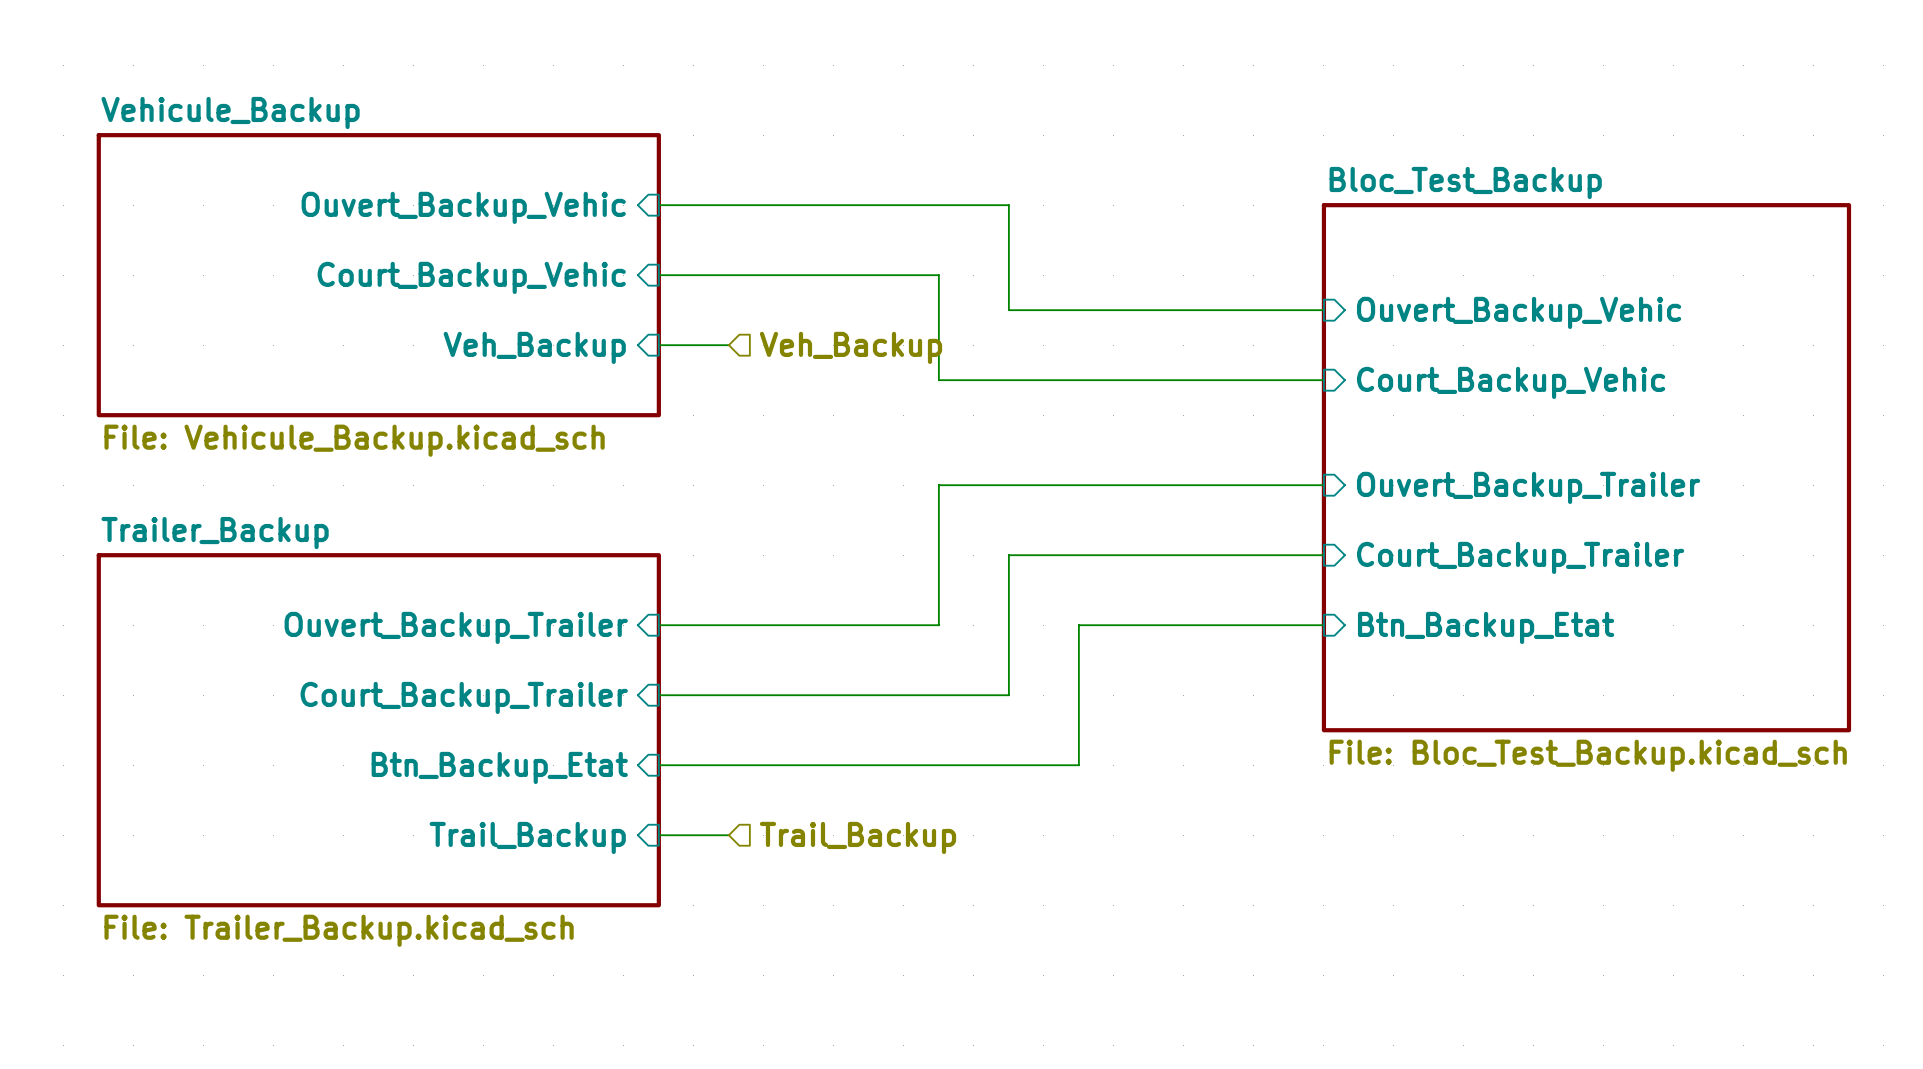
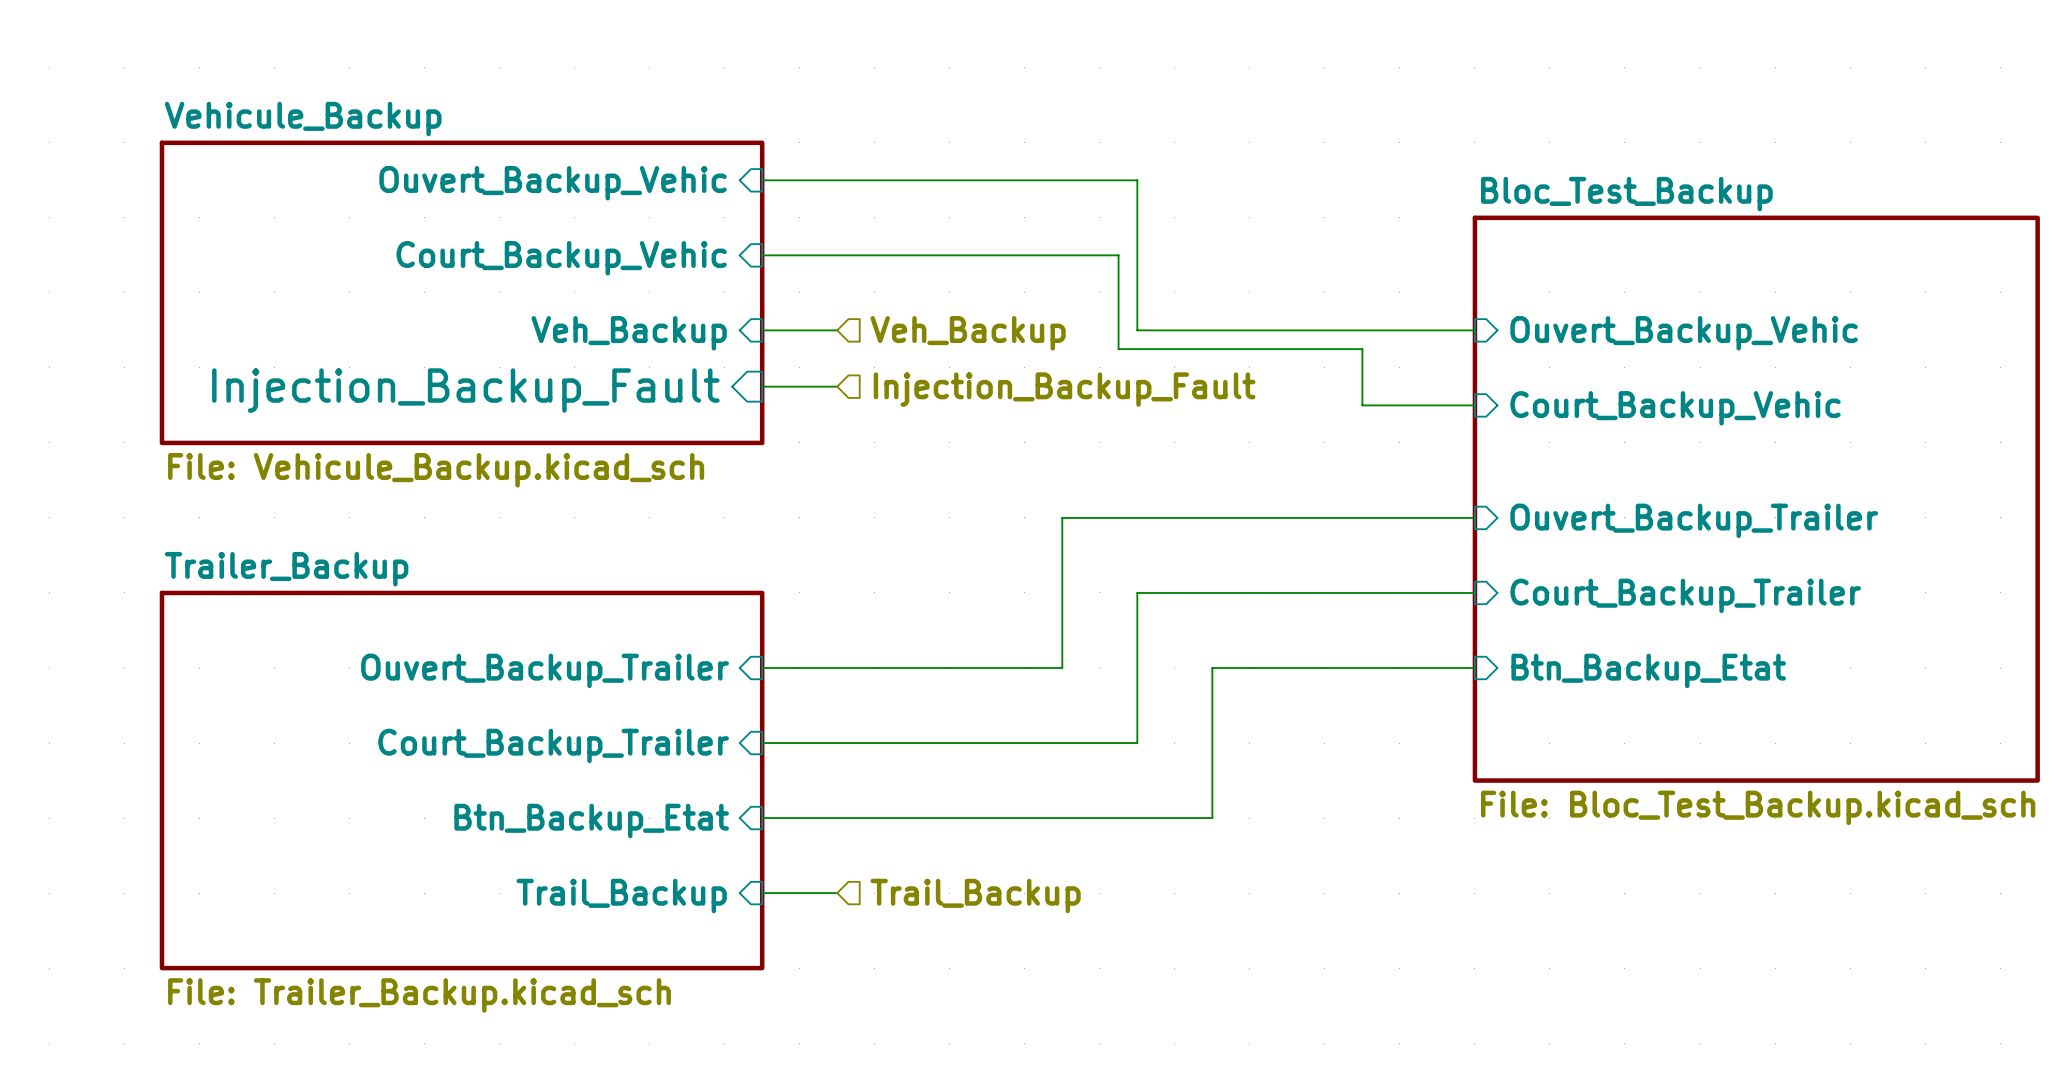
wire: (658, 205) (1008, 205) -> (762, 180) (1137, 180) (1137, 217)
sheet pin position: Ouvert_Backup_Vehic (463, 207) -> Ouvert_Backup_Vehic (553, 183)
wire: (658, 275) (938, 275) (938, 380) (1218, 380) -> (762, 255) (1118, 255) (1118, 349) (1362, 349) (1362, 405)
sheet pin position: Court_Backup_Vehic (471, 277) -> Court_Backup_Vehic (561, 258)
wire: none -> (762, 330) (837, 330)
wire: (658, 345) (728, 345) -> (762, 386) (837, 386)
sheet pin position: Veh_Backup (534, 347) -> Veh_Backup (629, 333)
hierarchical label position: Veh_Backup (850, 347) -> Veh_Backup (968, 333)
hierarchical label: none -> Injection_Backup_Fault (1064, 389)
sheet pin: none -> Injection_Backup_Fault (465, 390)

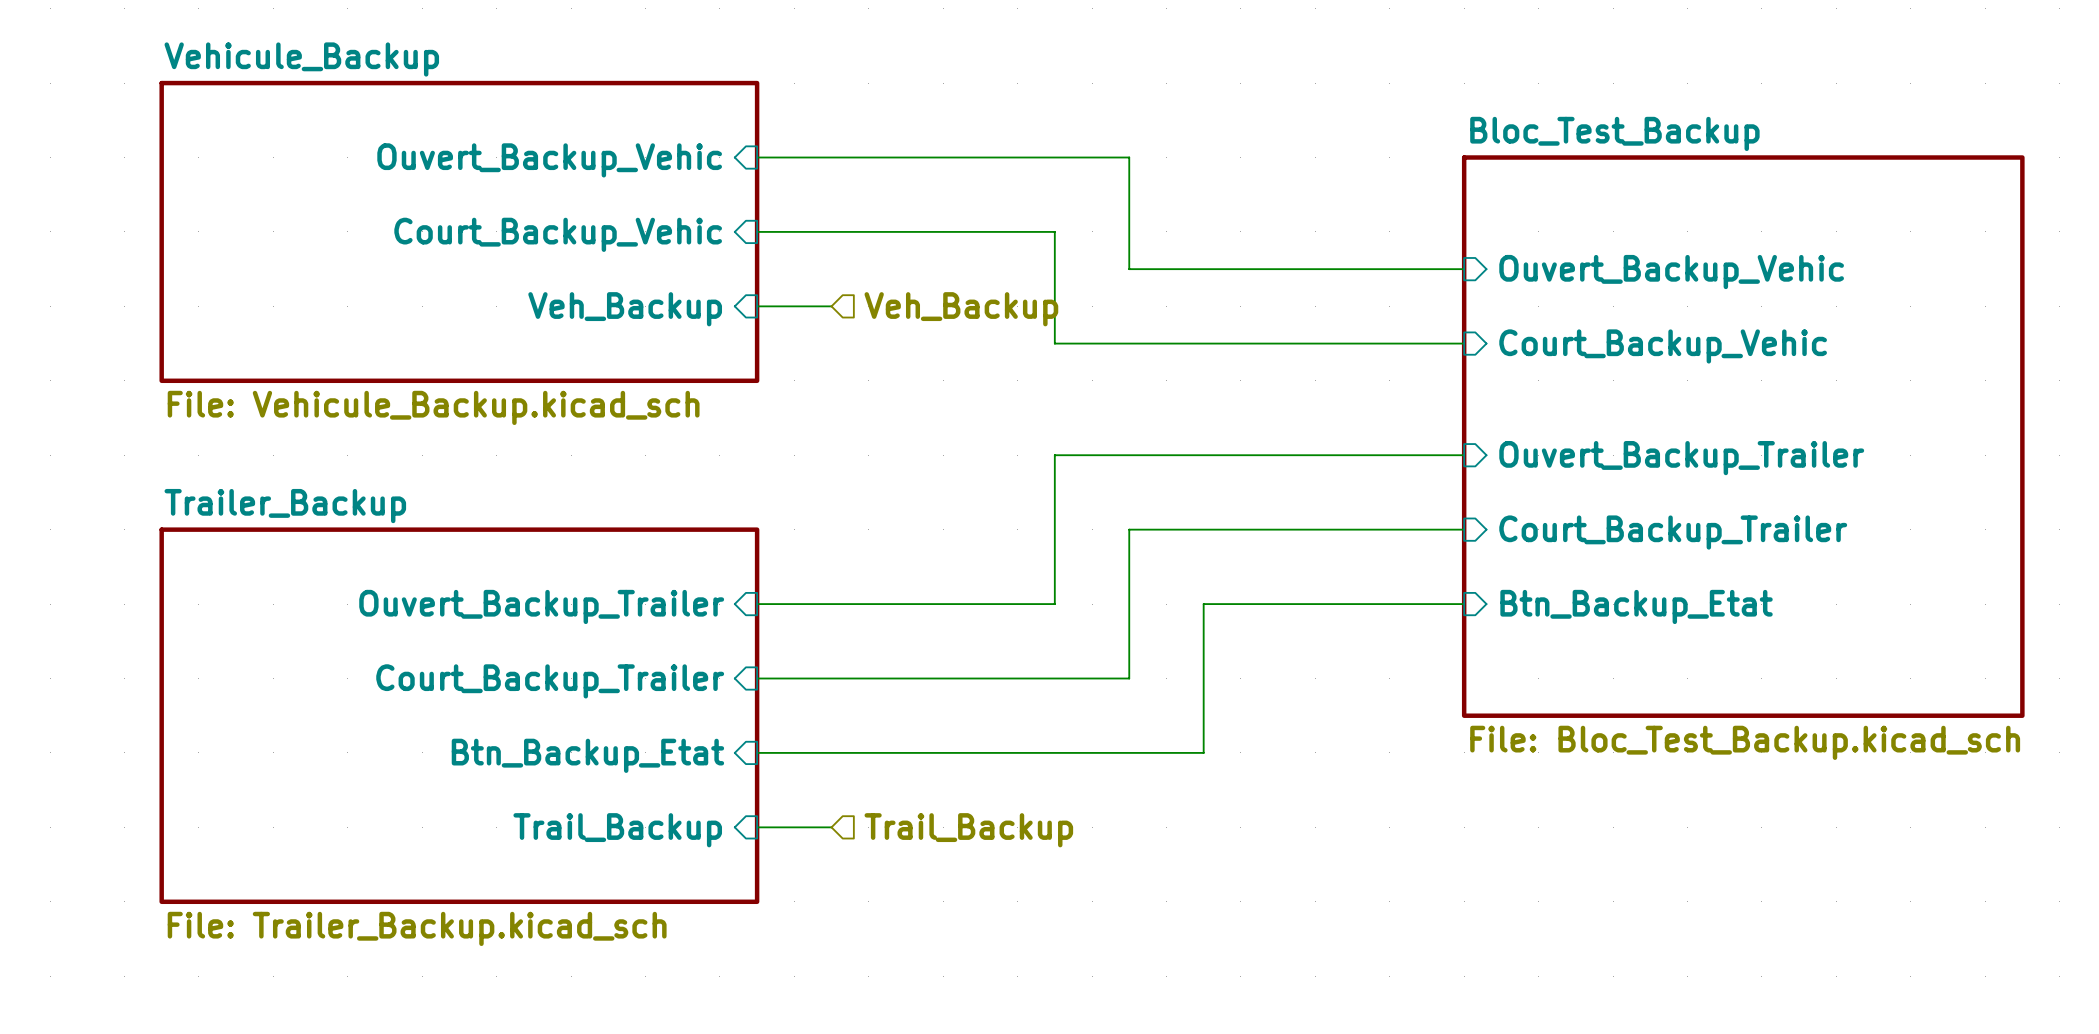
wire: (762, 180) (1137, 180) (1137, 217) -> (757, 157) (1129, 157)
sheet pin position: Ouvert_Backup_Vehic (553, 183) -> Ouvert_Backup_Vehic (549, 160)
wire: (762, 255) (1118, 255) (1118, 349) (1362, 349) (1362, 405) -> (757, 231) (1054, 231) (1054, 343) (1352, 343)
sheet pin position: Court_Backup_Vehic (561, 258) -> Court_Backup_Vehic (558, 234)
wire: (762, 330) (837, 330) -> none
sheet pin position: Veh_Backup (629, 333) -> Veh_Backup (625, 309)
hierarchical label position: Veh_Backup (968, 333) -> Veh_Backup (961, 309)
wire: (762, 386) (837, 386) -> (757, 306) (831, 306)
hierarchical label: Injection_Backup_Fault (1064, 389) -> none
sheet pin: Injection_Backup_Fault (465, 390) -> none

